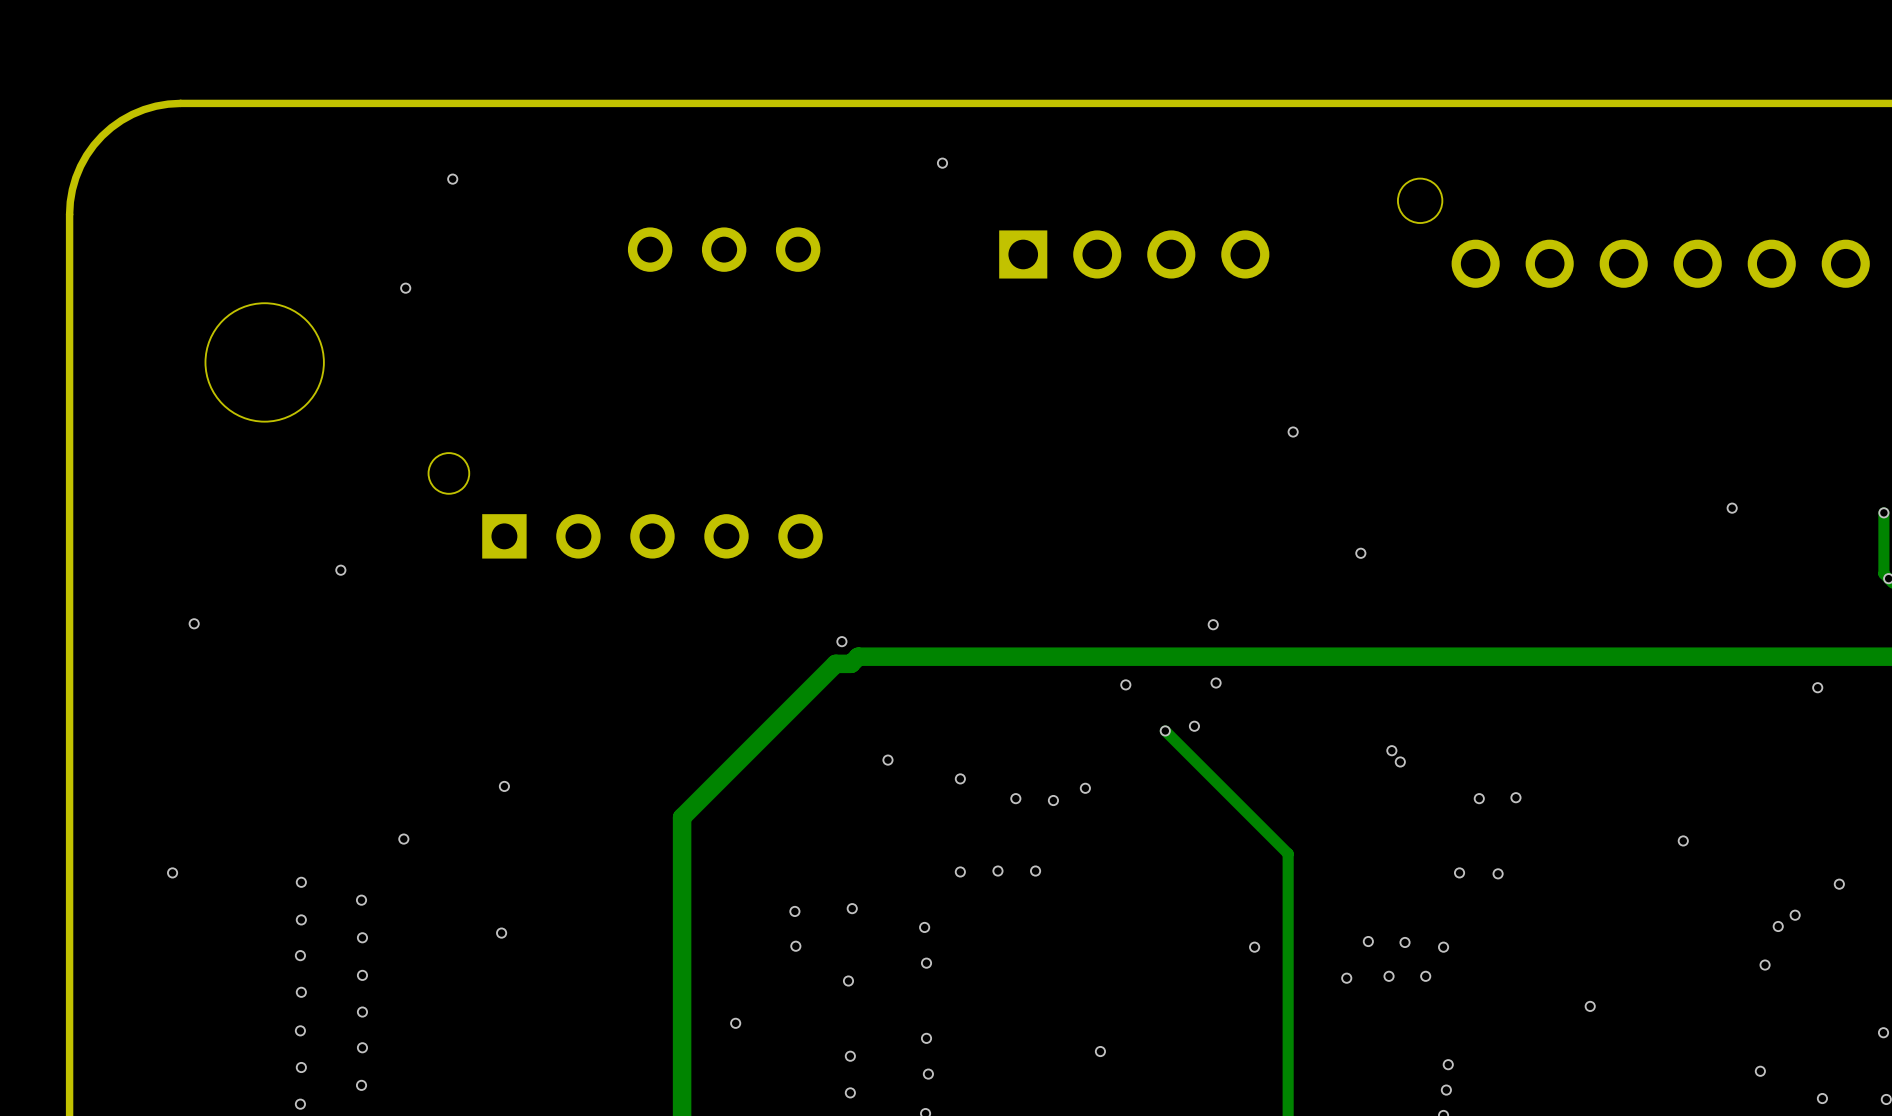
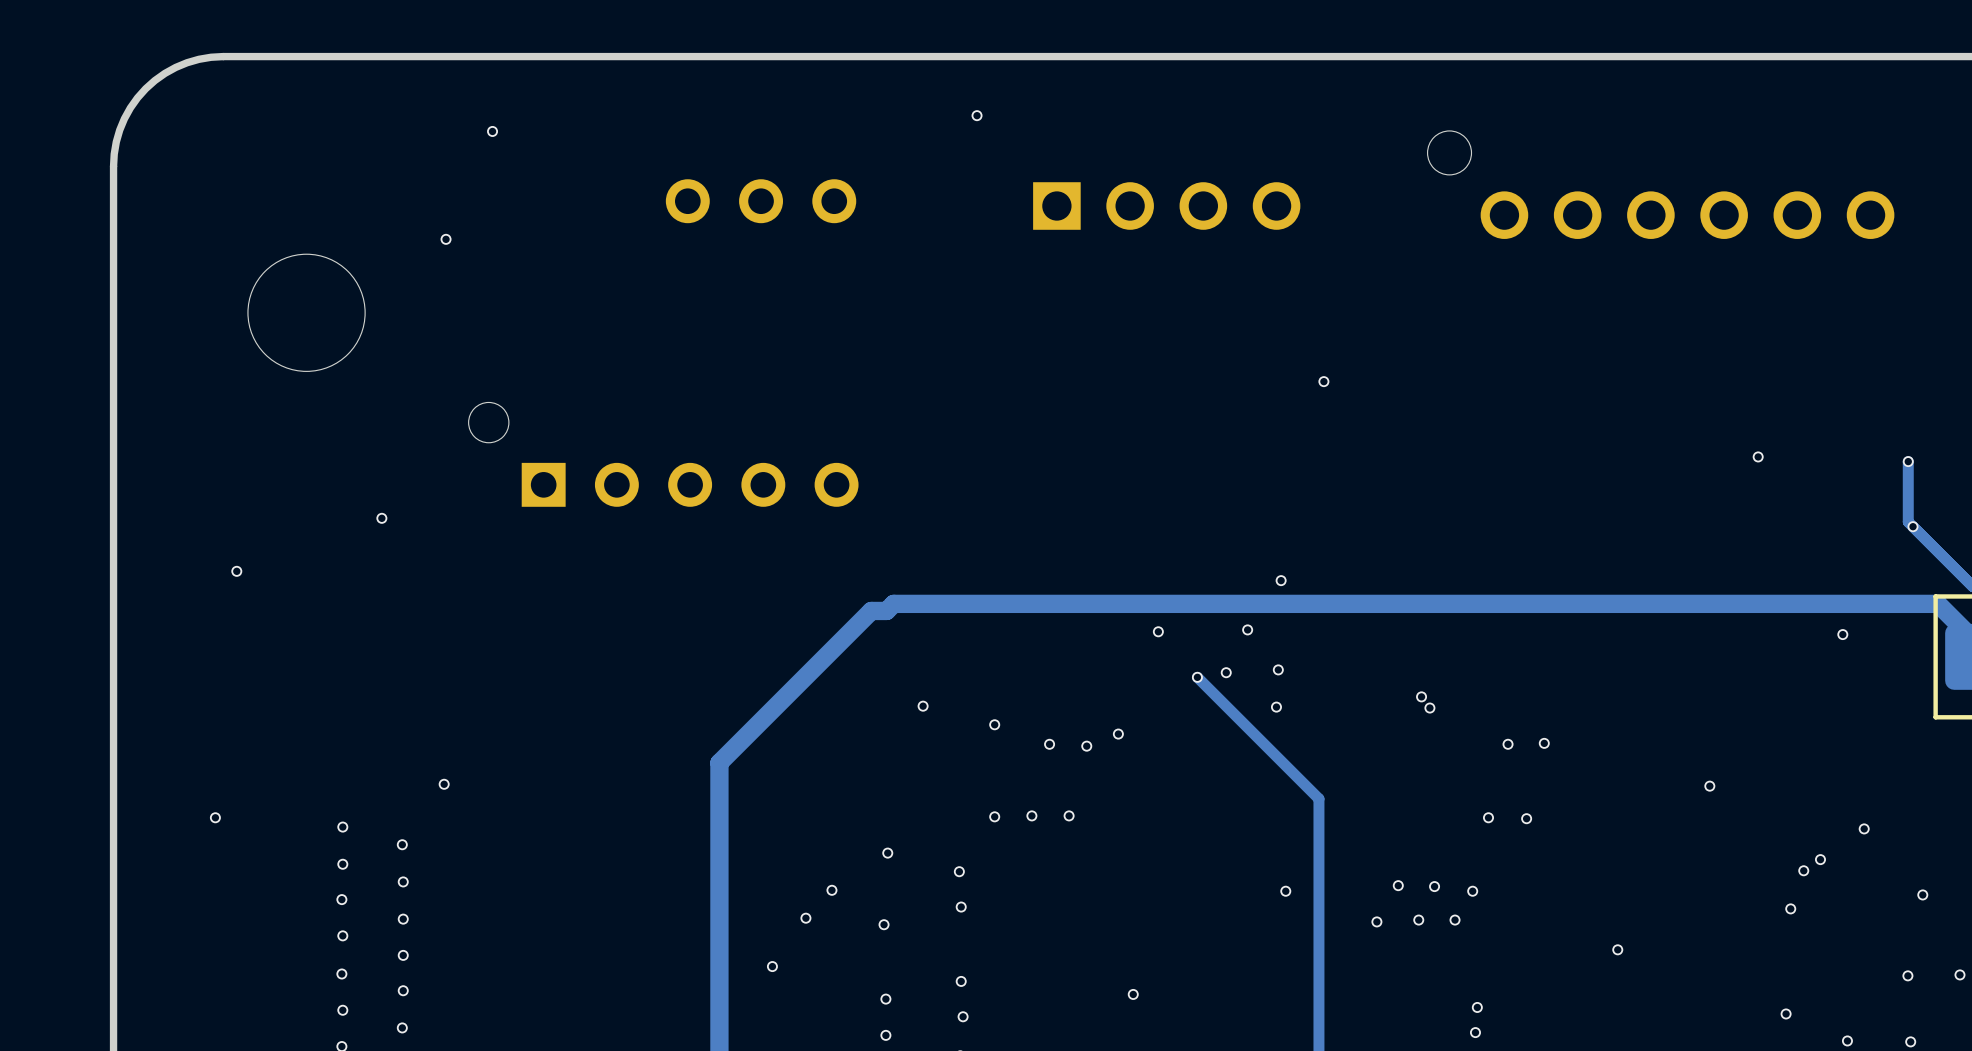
via: (1360, 553) -> none
via position: (1213, 624) -> (1281, 580)
via: (841, 641) -> none
via: none -> (1278, 669)
via: none -> (1276, 707)
via: (504, 786) -> none
via position: (794, 911) -> (805, 918)
via: (501, 933) -> none

